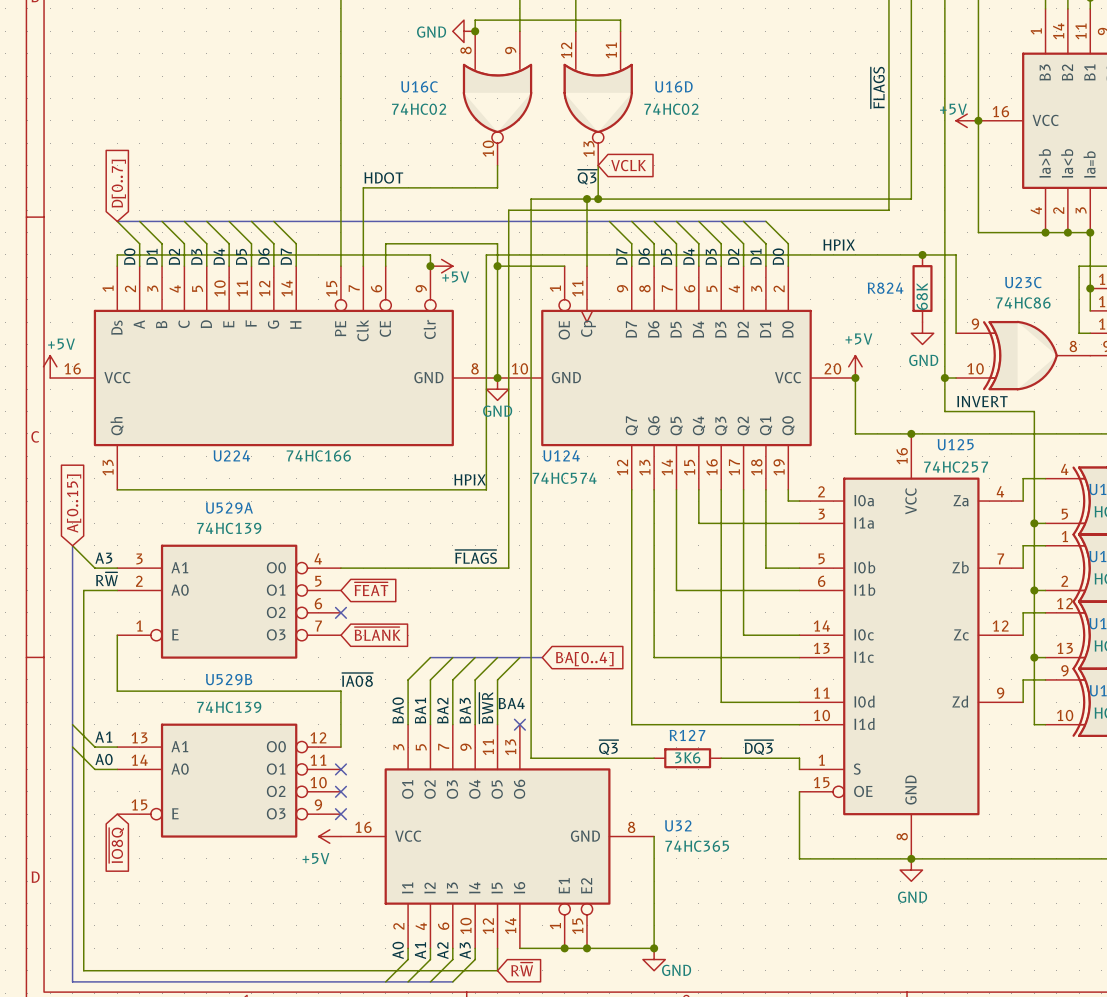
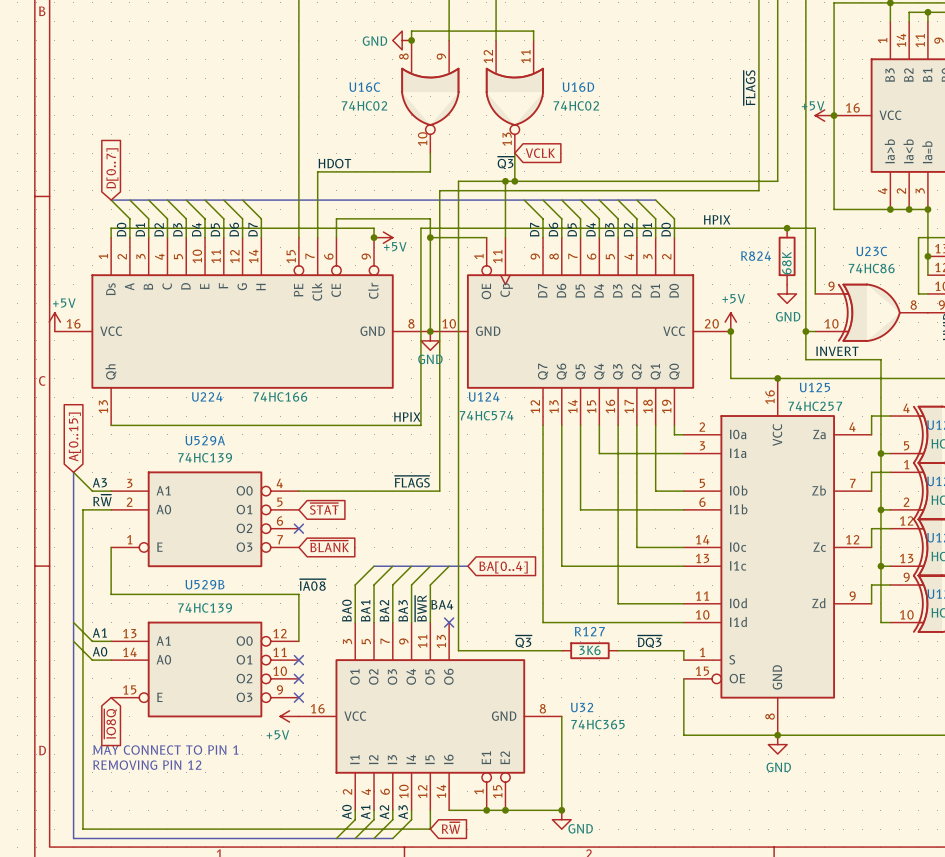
global label: ~{FEAT} (371, 589) -> ~{STAT} (324, 508)
text: none -> MAY CONNECT TO PIN 1 (165, 750)
text: none -> REMOVING PIN 12 (147, 765)

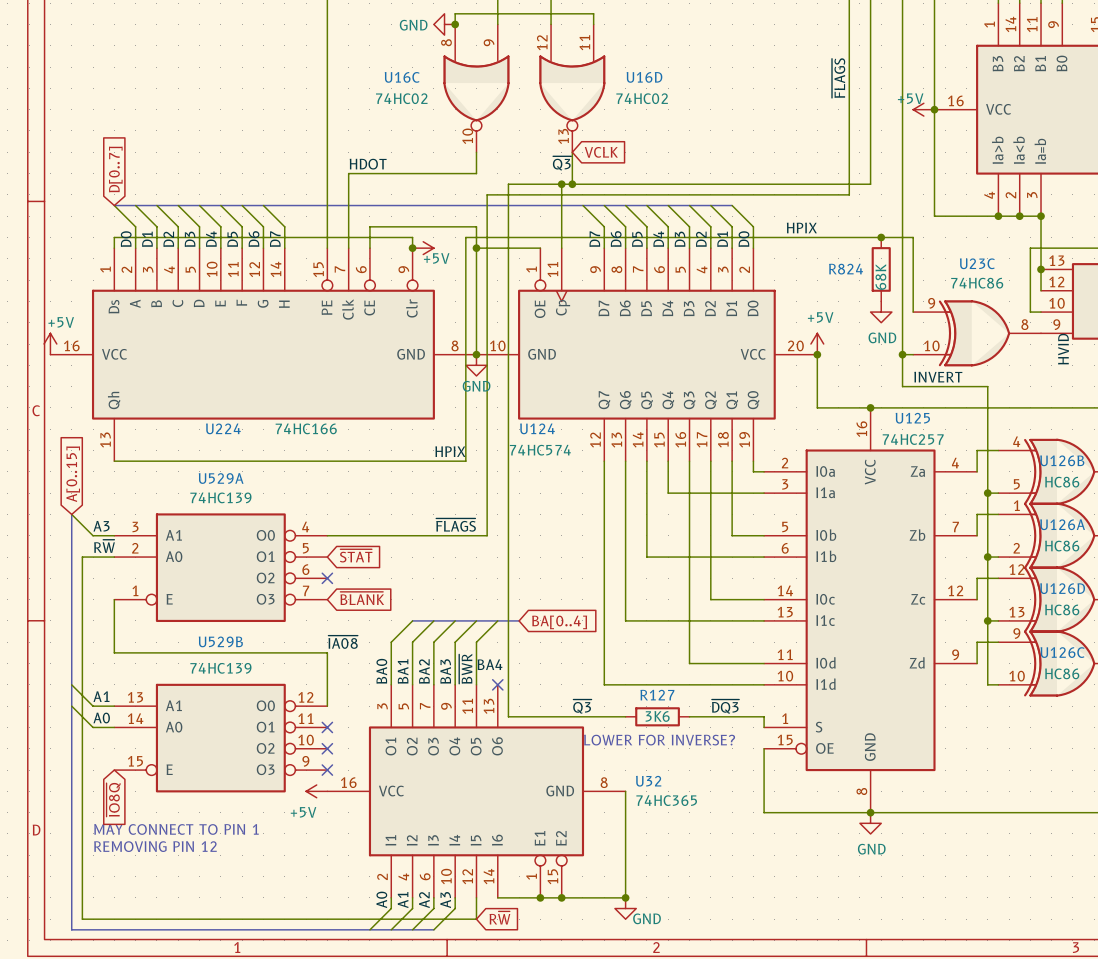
text: none -> LOWER FOR INVERSE? (659, 740)

